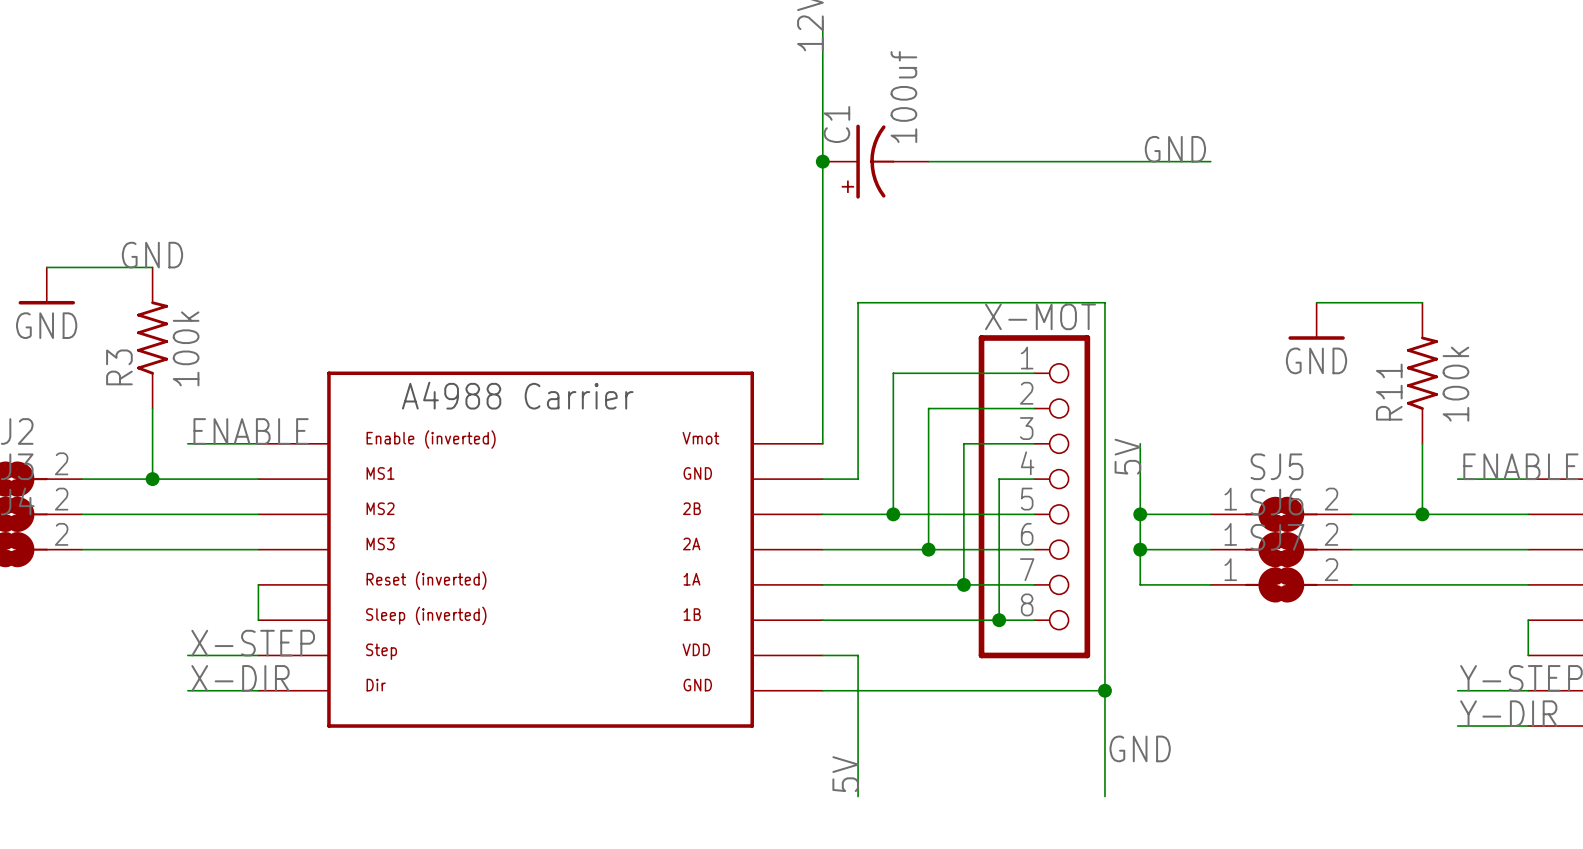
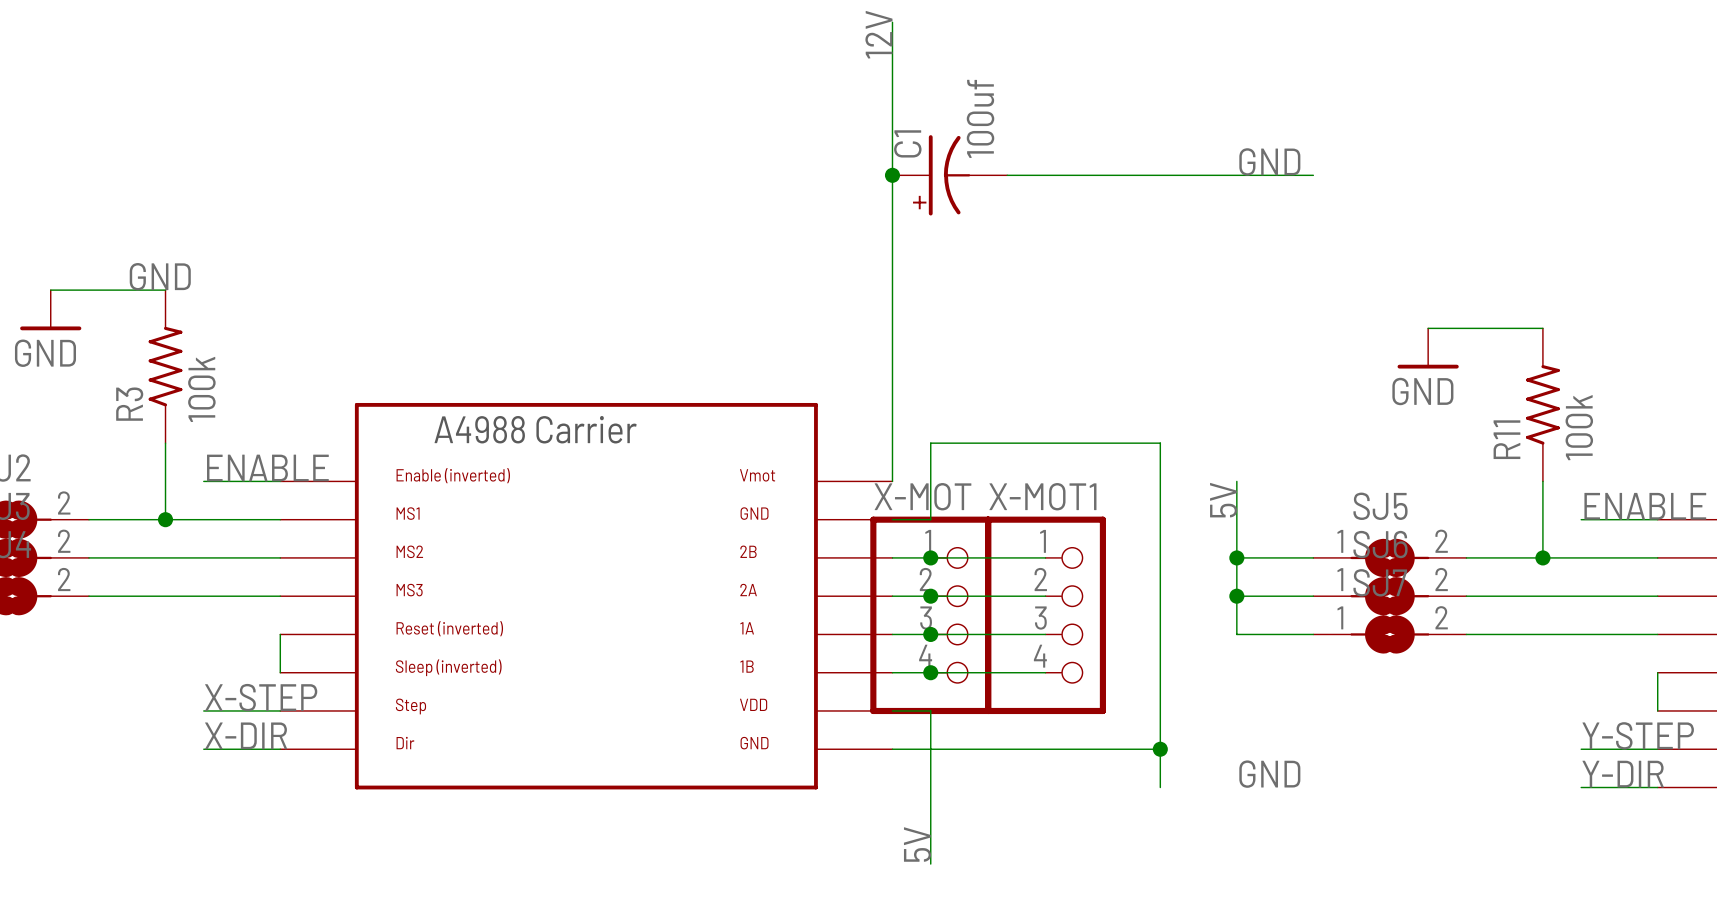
wire: (1034, 373) (893, 373) (893, 514) -> none
wire: (858, 408) (858, 302) (1104, 302) (1104, 796) -> none
wire: (928, 408) (928, 549) -> (1007, 443) (930, 443)
wire: none -> (1122, 443) (1160, 443) (1160, 787)
wire: (1034, 443) (963, 443) (963, 584) (1034, 584) -> none
wire: (1034, 479) (999, 479) (999, 620) -> none
X-MOT: (1034, 496) -> none
junction: none -> (930, 557)
junction: (893, 514) -> none
wire: (963, 514) (1034, 514) -> none
junction: none -> (930, 596)
junction: (928, 549) -> none
wire: (963, 549) (1034, 549) -> none
X-MOT: none -> (930, 615)
X-MOT1: none -> (1045, 615)
junction: none -> (930, 634)
junction: (963, 584) -> none
junction: none -> (930, 672)
wire: (963, 620) (1034, 620) -> none
junction: (999, 620) -> none
wire: (1069, 690) (1104, 690) -> none
junction position: (1104, 690) -> (1160, 749)
label position: GND (1140, 748) -> GND (1269, 774)

